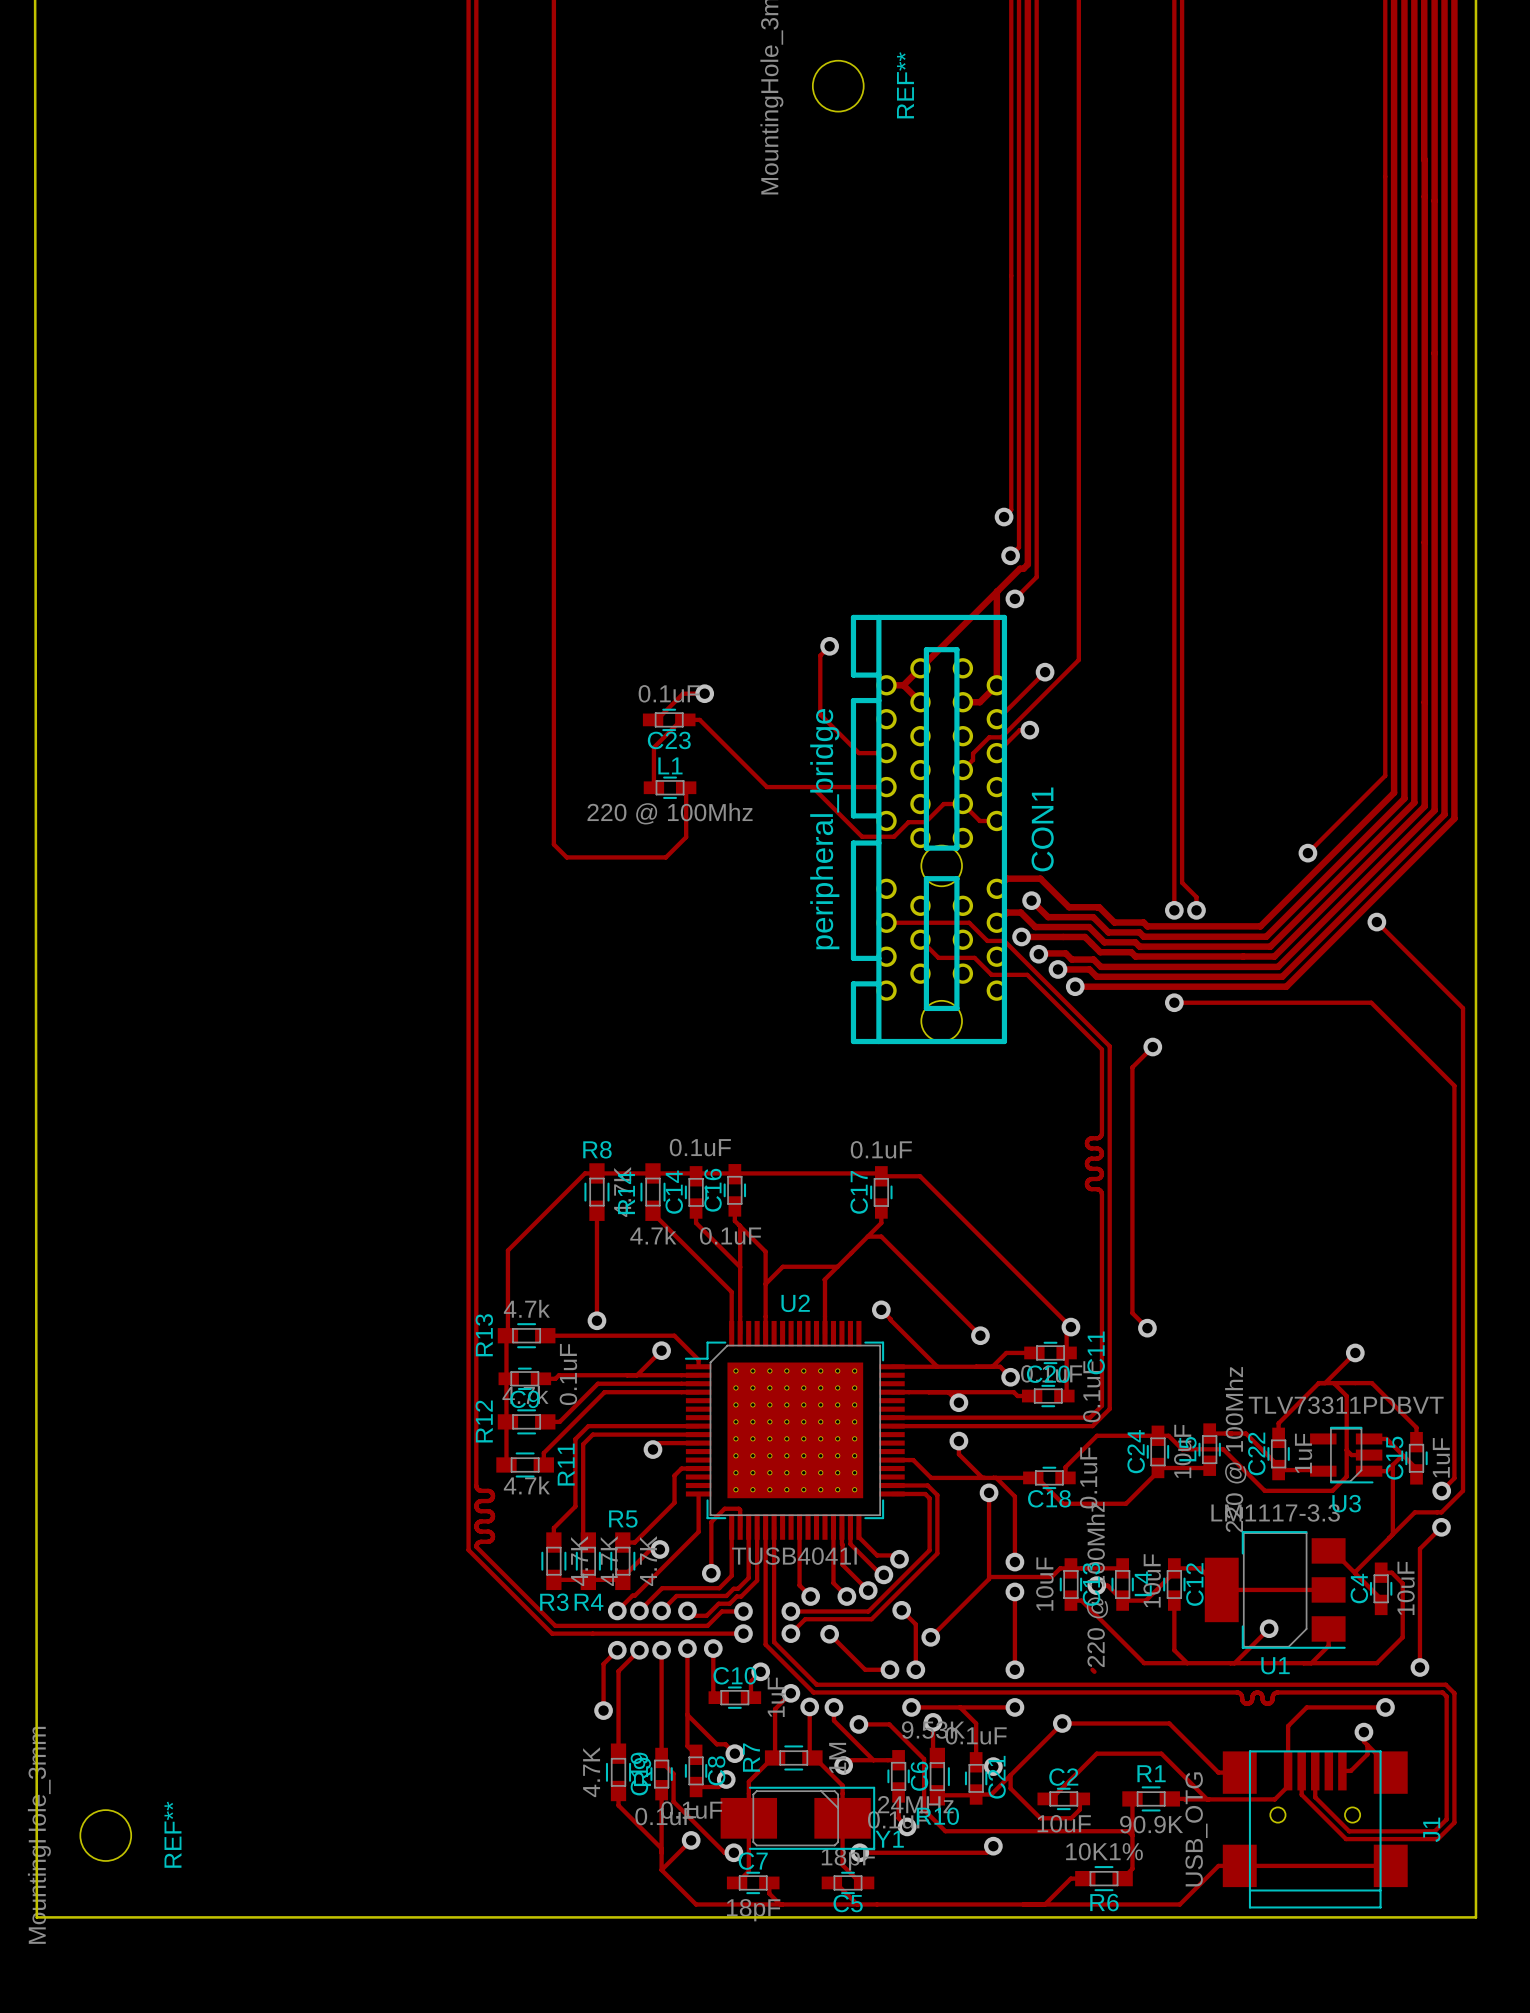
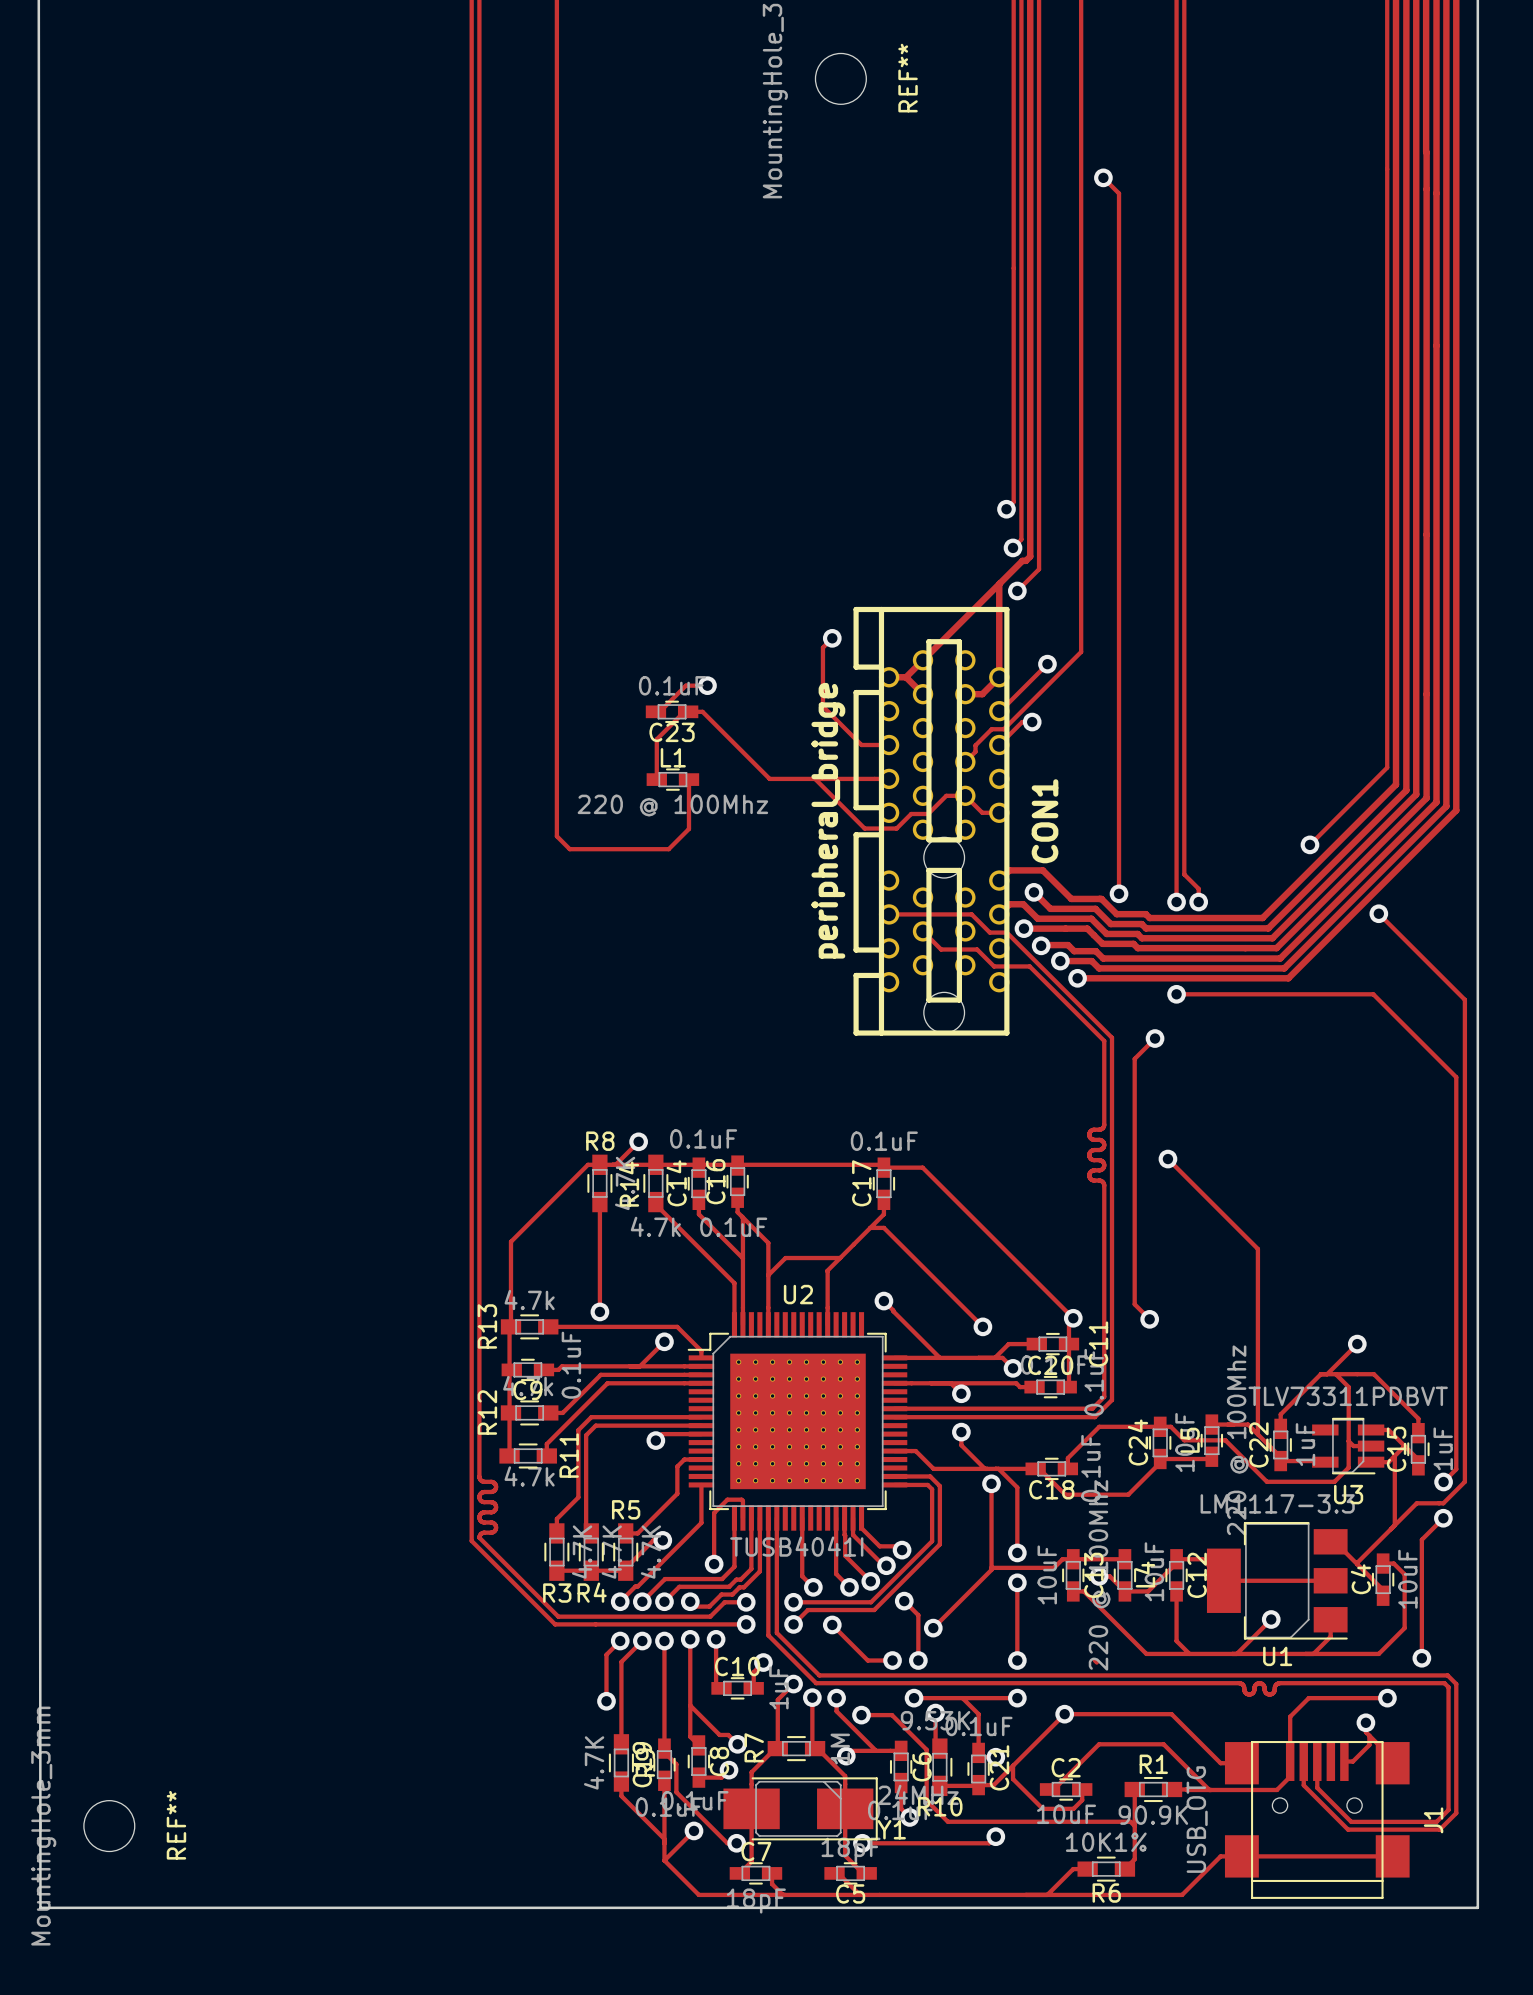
track: none -> (1103, 177) (1119, 193) (1119, 893)
via: none -> (1103, 177)
via: none -> (1119, 893)
track: none -> (638, 1141) (615, 1164)
via: none -> (638, 1141)
track: none -> (1167, 1159) (1257, 1248) (1257, 1434)
via: none -> (1167, 1159)

